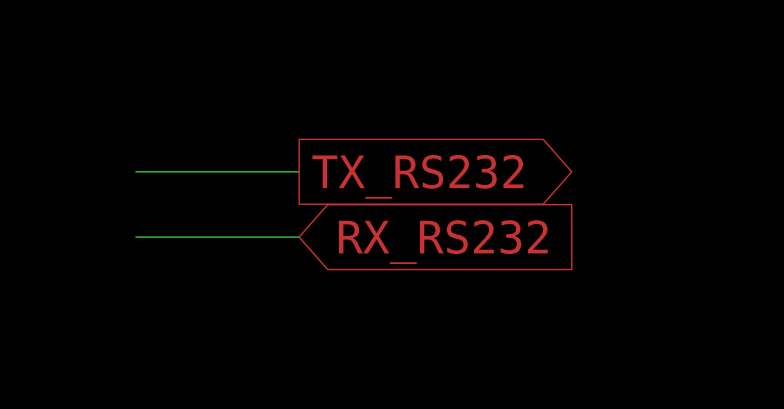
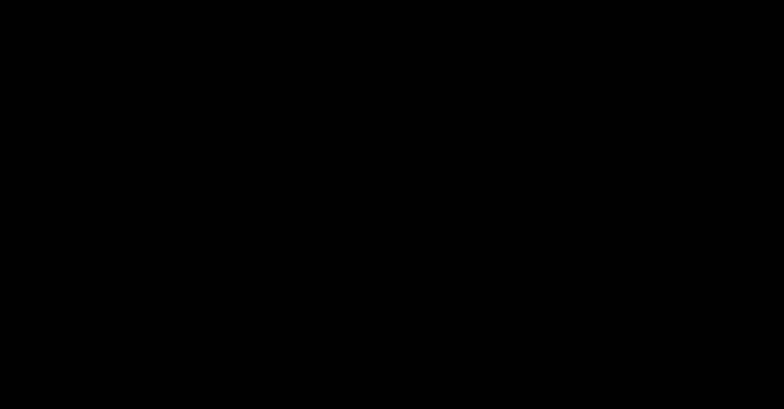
wire: (135, 171) (299, 171) -> none
global label: TX_RS232 (417, 176) -> none
wire: (135, 237) (299, 237) -> none
global label: RX_RS232 (443, 242) -> none

